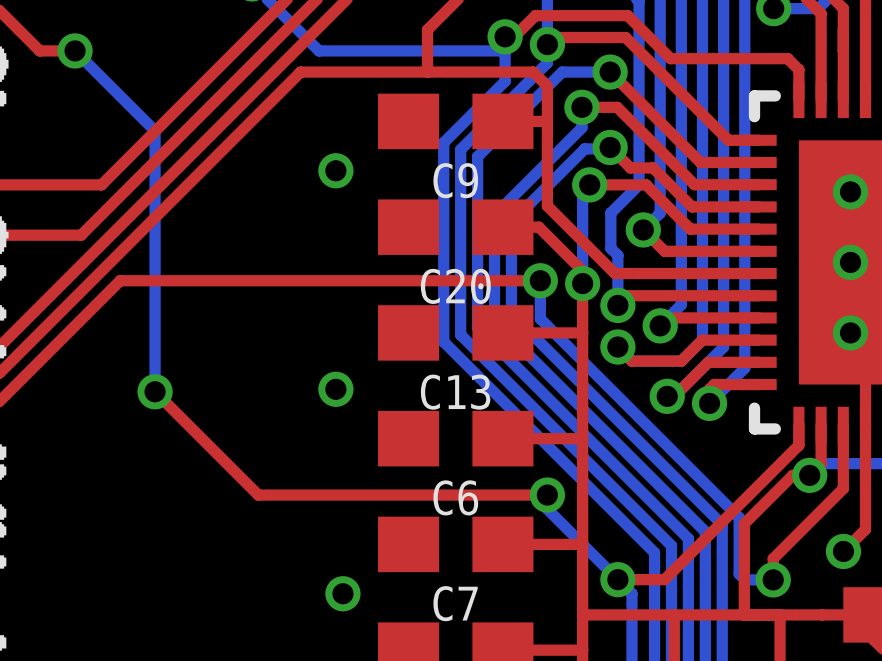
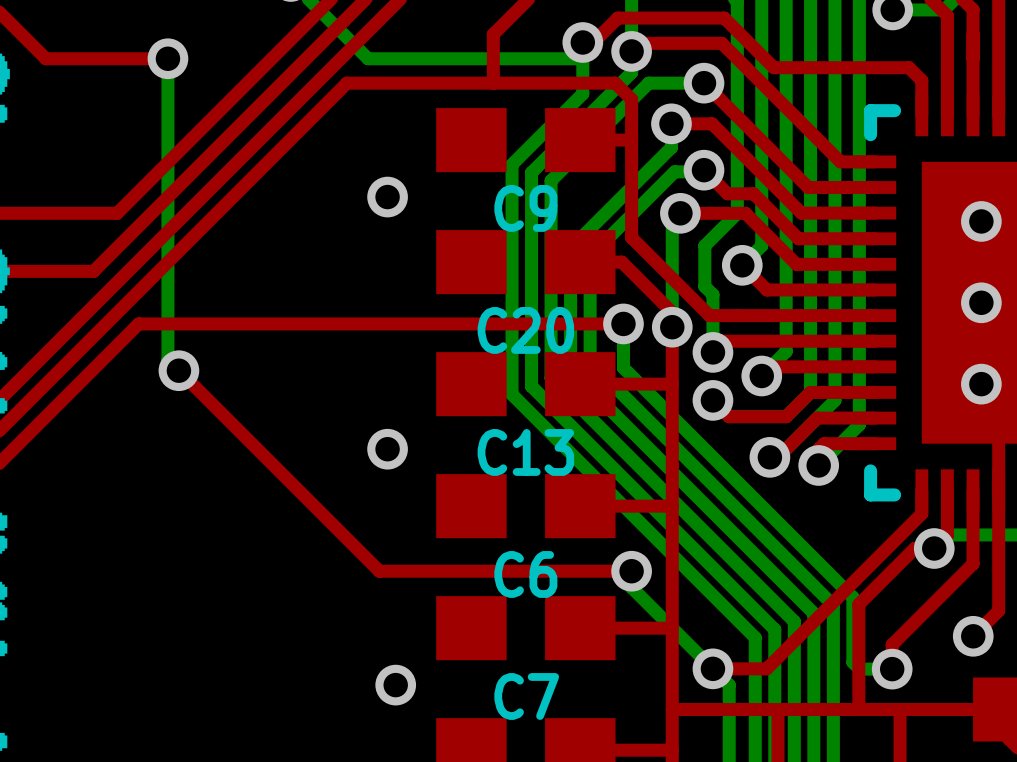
bottom track: (75, 50) (155, 130) (155, 391) -> none
top track: none -> (86, 58) (167, 58)
via position: (75, 50) -> (167, 58)
bottom track: none -> (167, 58) (167, 359) (178, 370)
top track: (155, 391) (258, 495) (328, 495) -> (178, 370) (379, 571)
via position: (155, 391) -> (178, 370)

